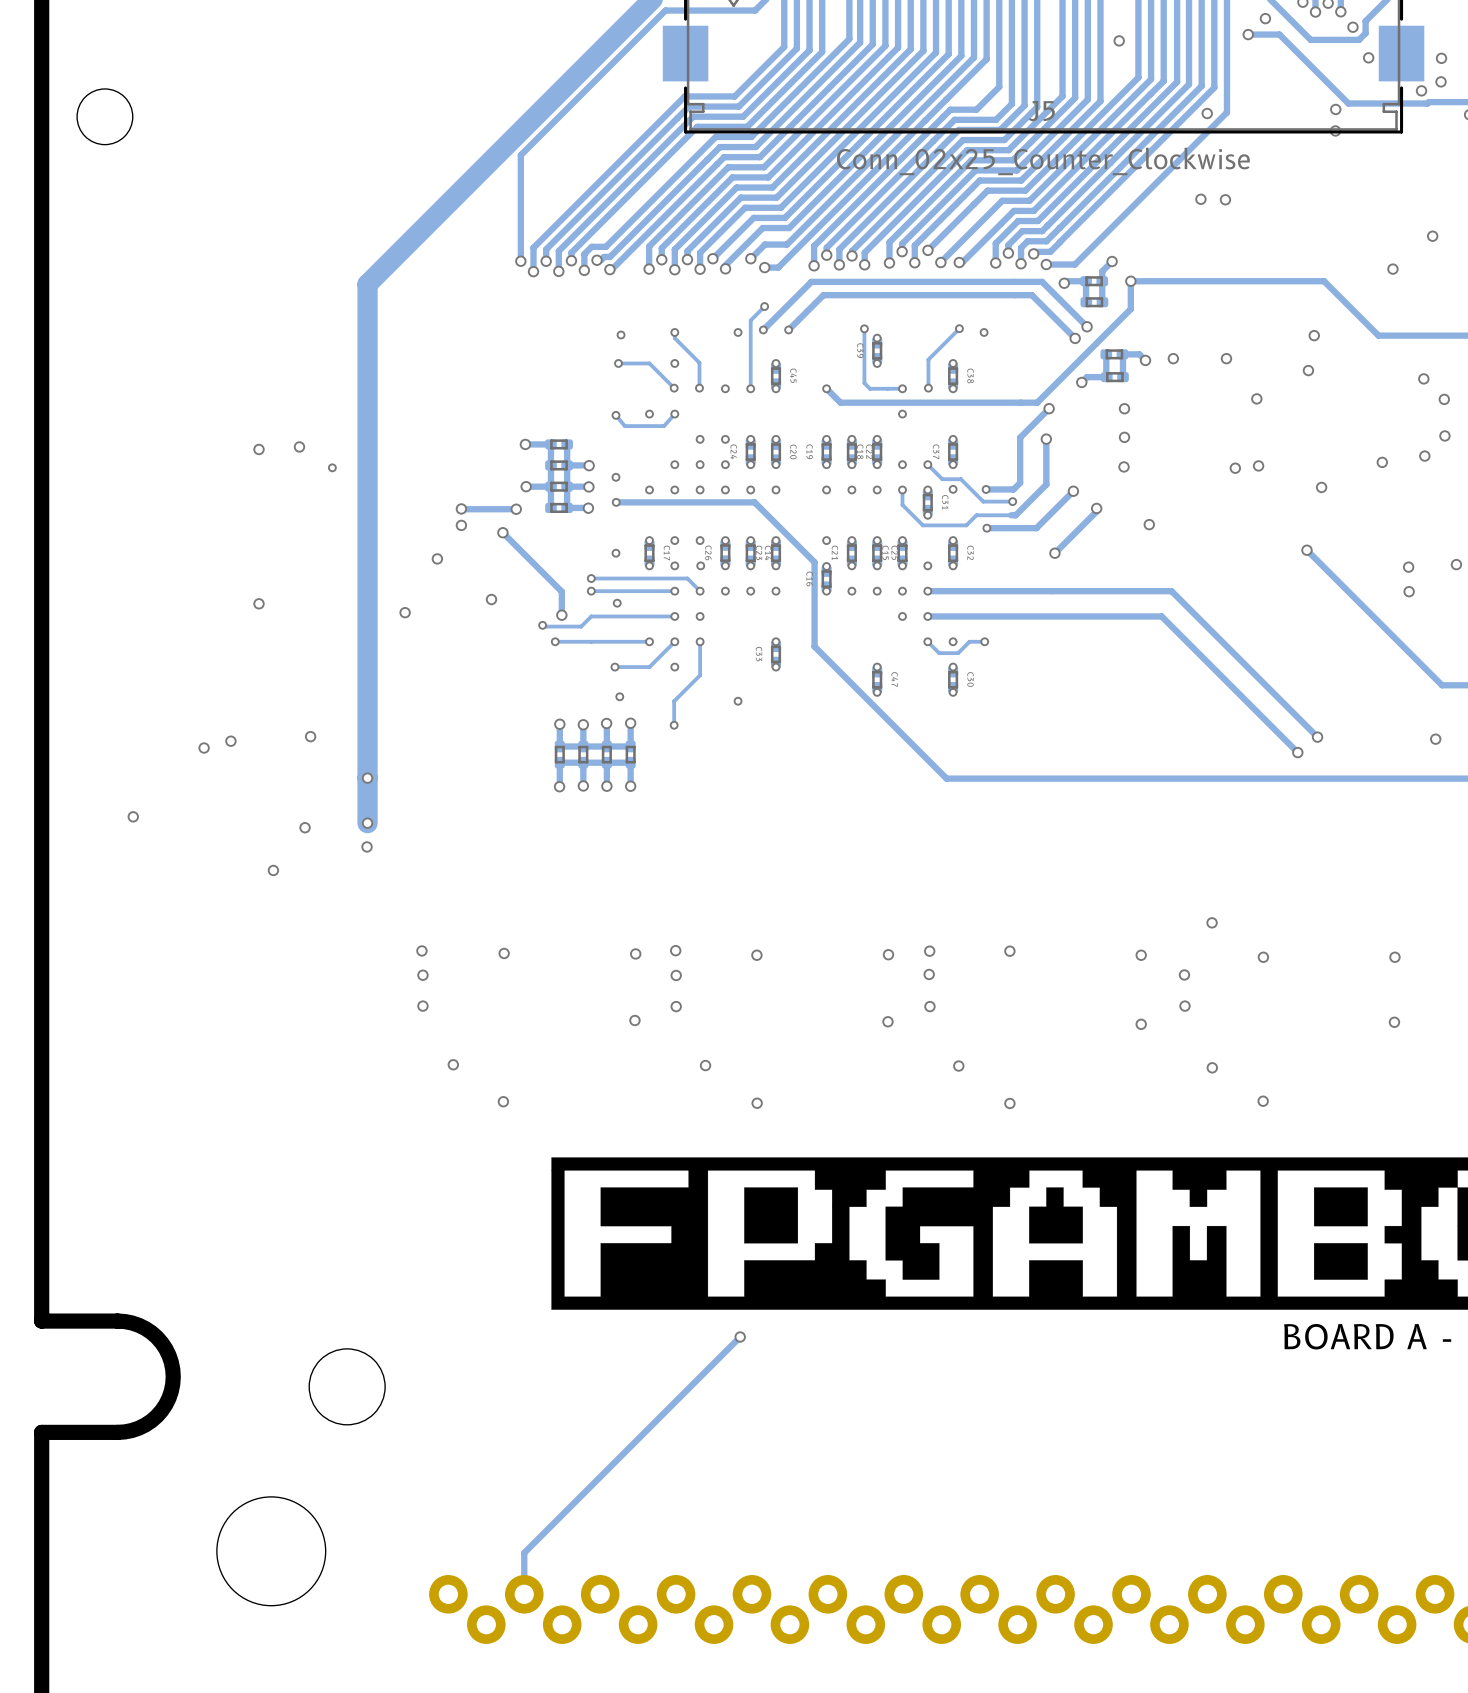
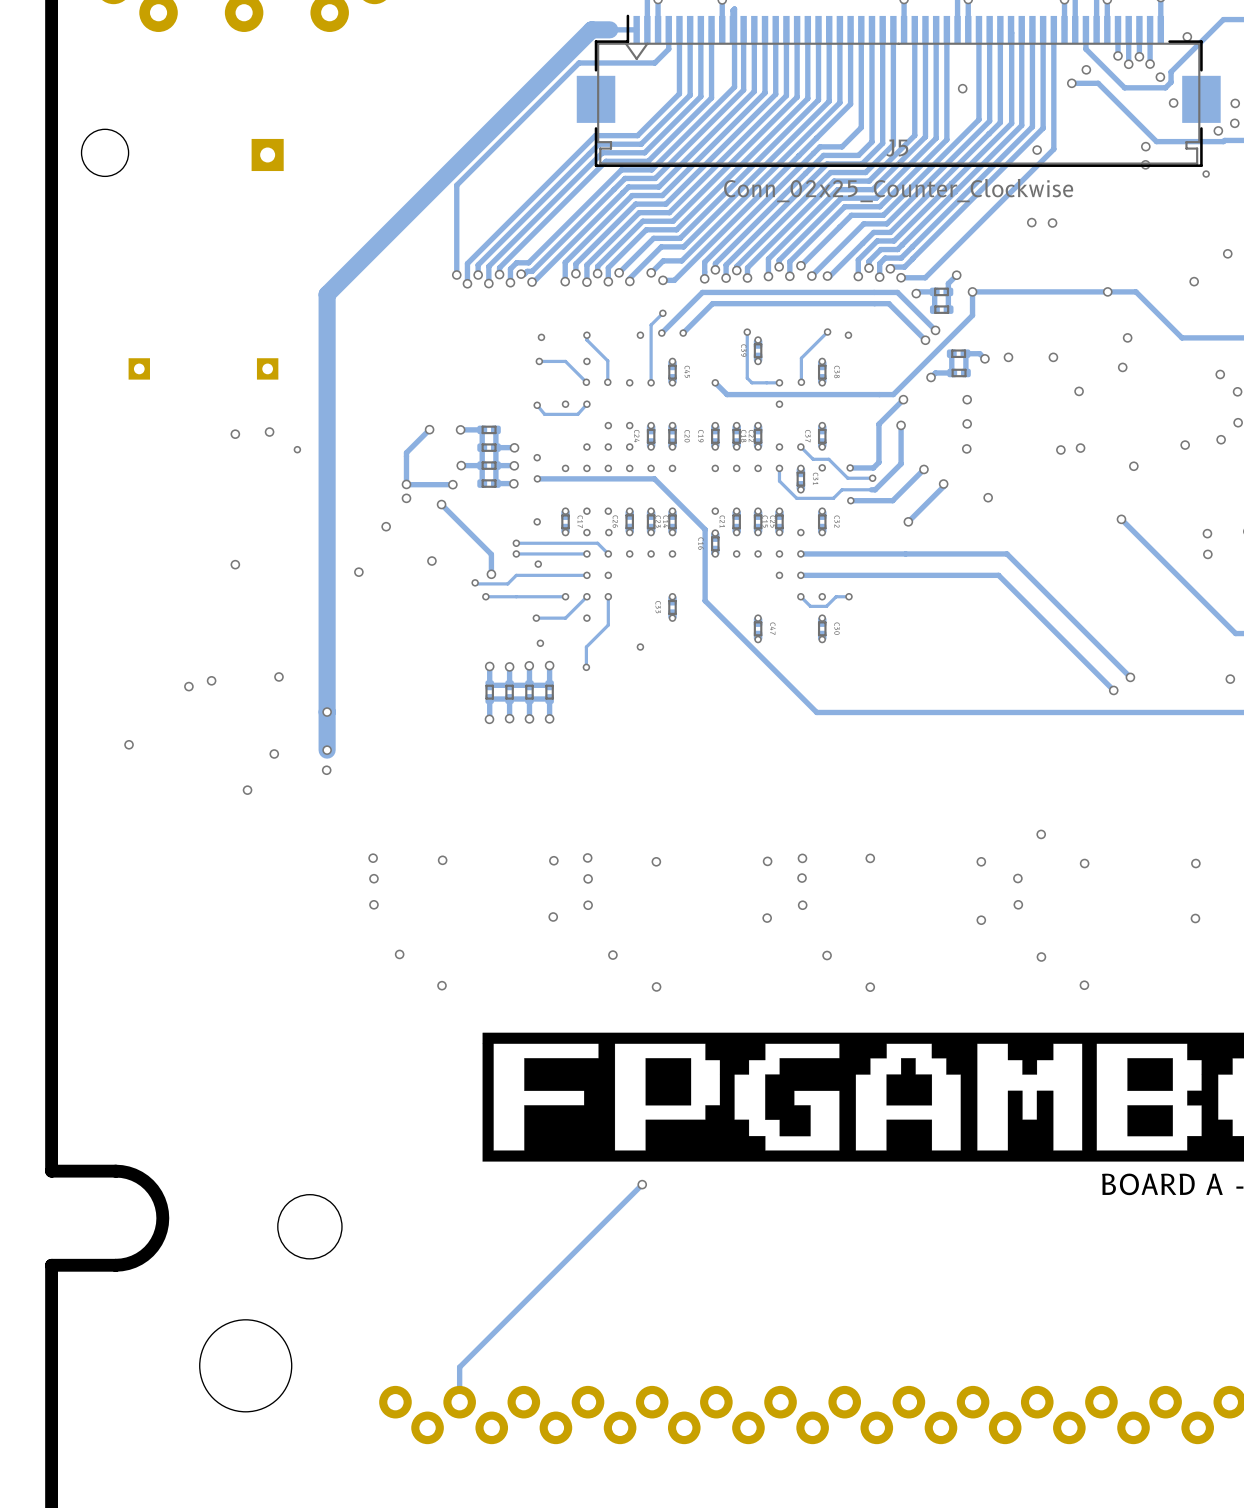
part: none -> (267, 154)
via: none -> (1206, 174)
via: none -> (1107, 291)
part: none -> (139, 368)
part: none -> (267, 368)
track: none -> (429, 429) (406, 452) (406, 484)
via: none -> (429, 429)

